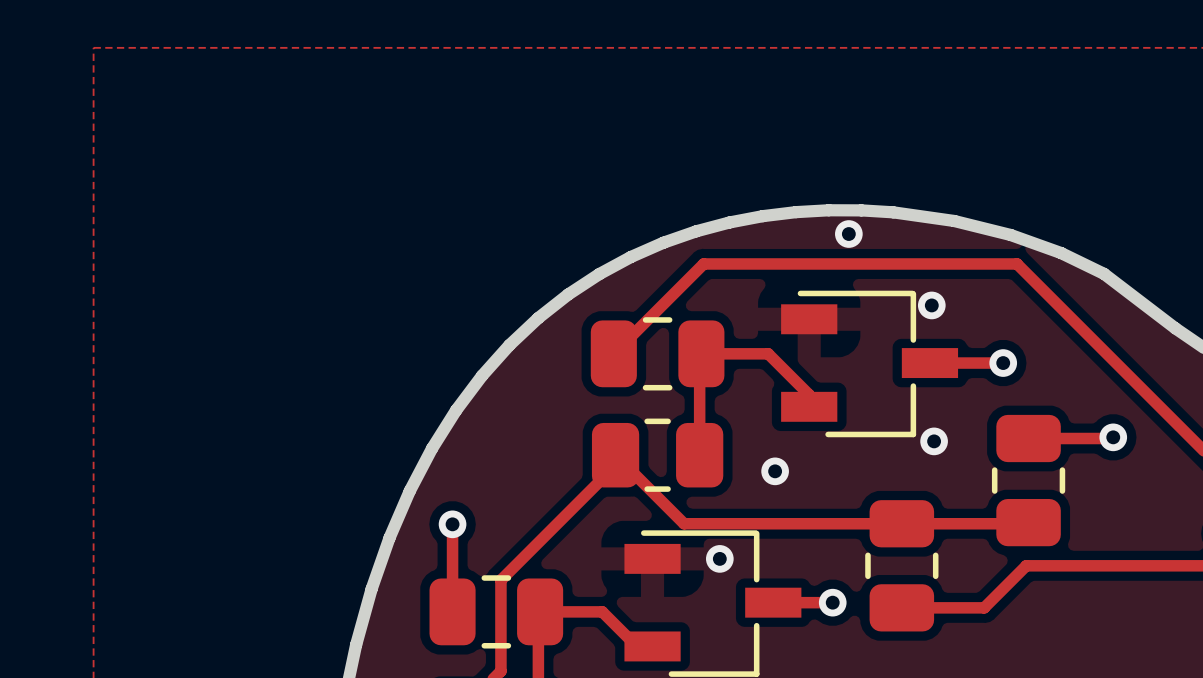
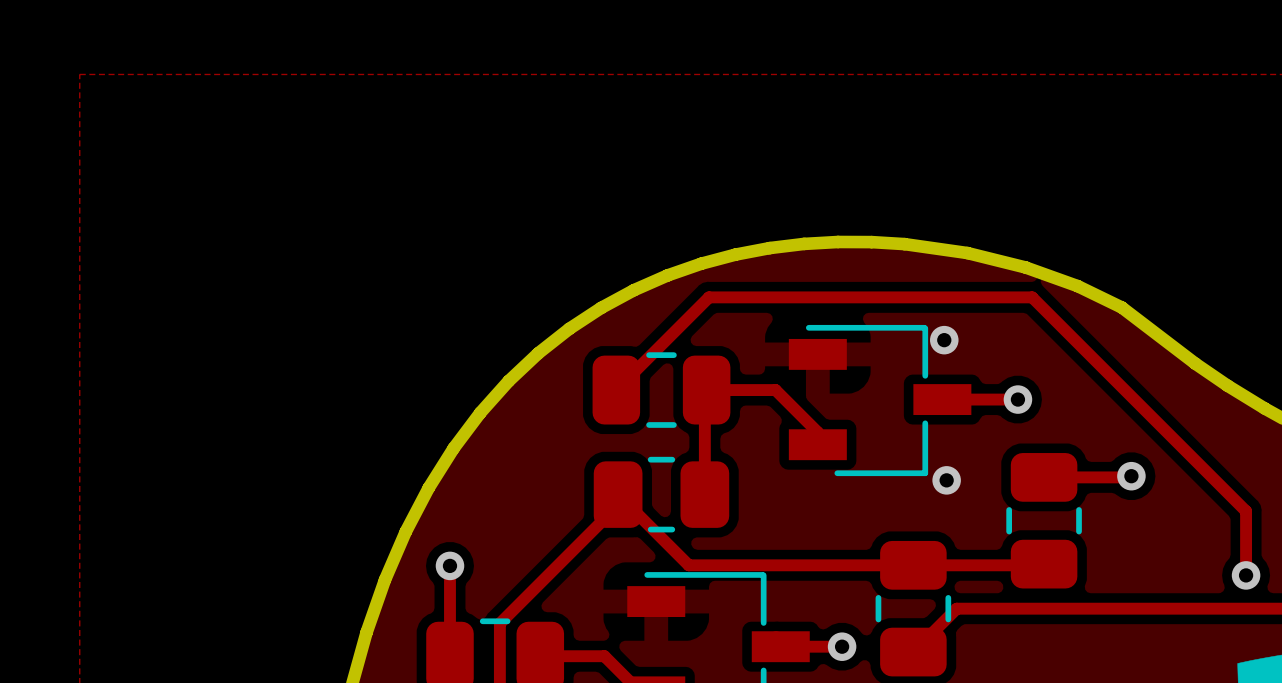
via: (848, 234) -> none
via: (775, 471) -> none
via: (719, 558) -> none
track: (1026, 565) (984, 607) (901, 607) -> (1041, 608) (956, 608) (913, 652)

